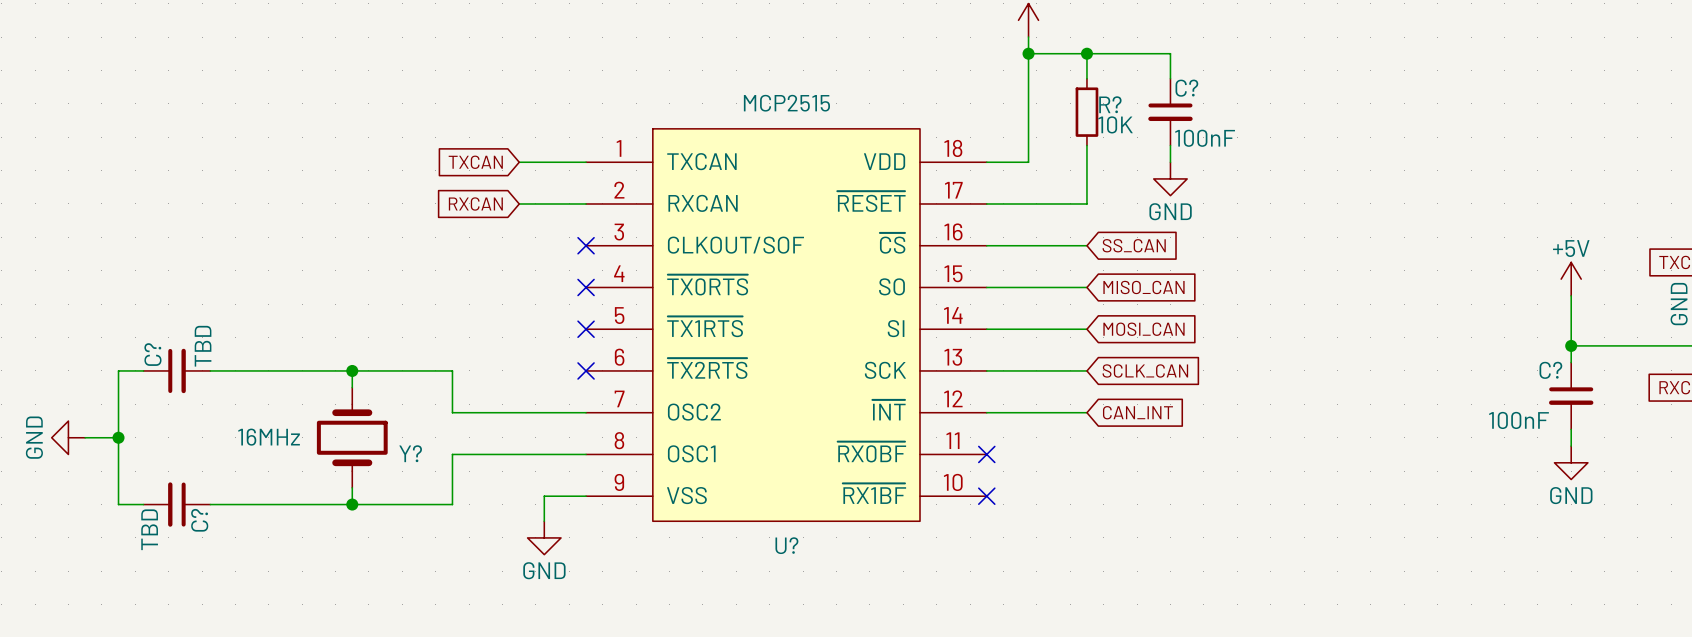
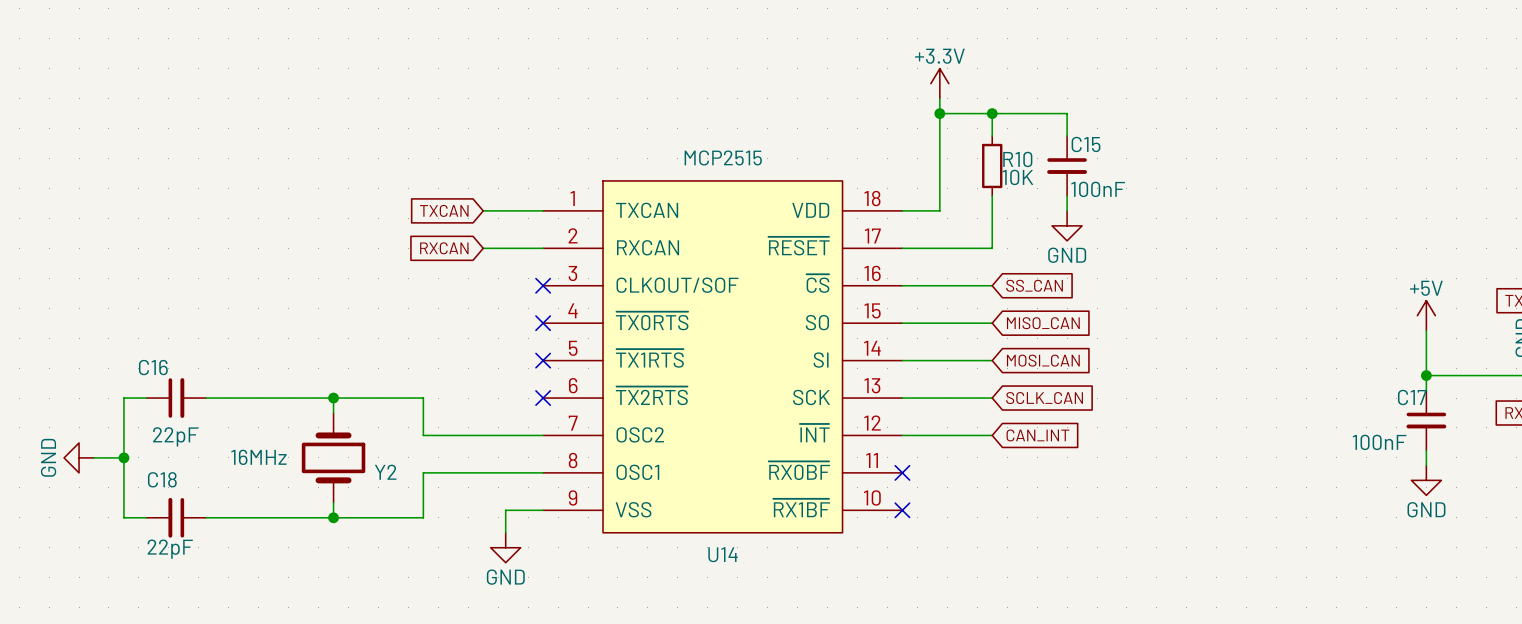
C? name: C? (1186, 88) -> C15 (1086, 144)
R? name: R? (1110, 104) -> R10 (1017, 159)
C? value: TBD (203, 346) -> 22pF (175, 436)
C? name: C? (152, 354) -> C16 (153, 367)
C? name: C? (1550, 370) -> C17 (1412, 397)
Y? name: Y? (410, 453) -> Y2 (385, 472)
C? name: C? (199, 520) -> C18 (162, 479)
C? value: TBD (149, 529) -> 22pF (170, 549)
U? name: U? (786, 545) -> U14 (723, 554)

